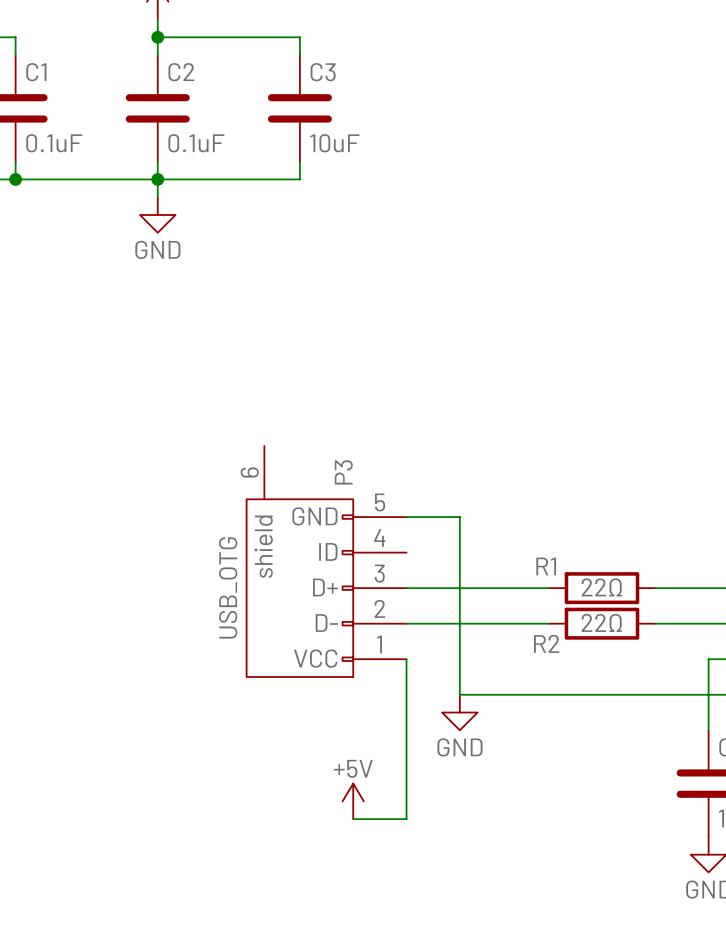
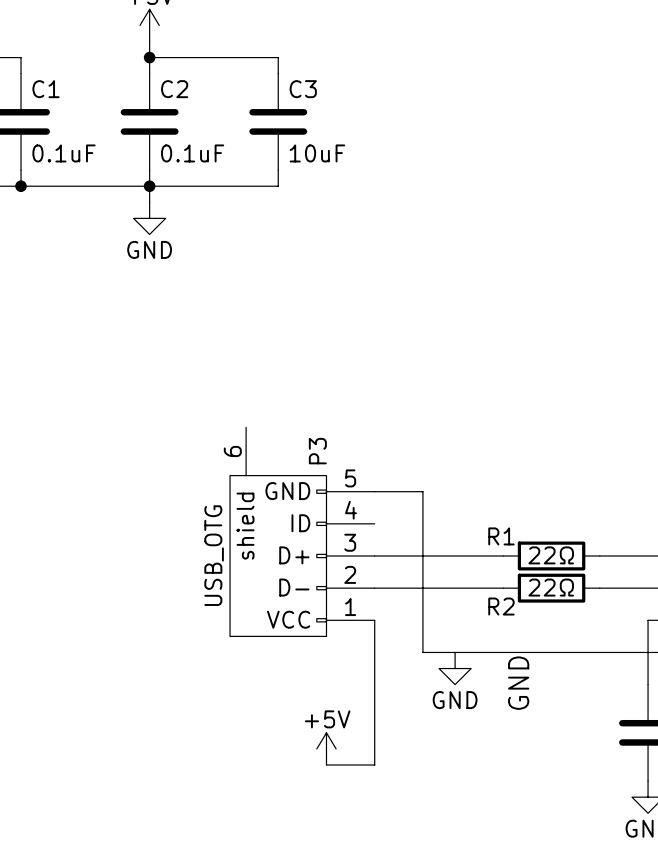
power symbol position: GND (459, 712) -> GND (455, 668)
label: none -> GND (518, 683)

